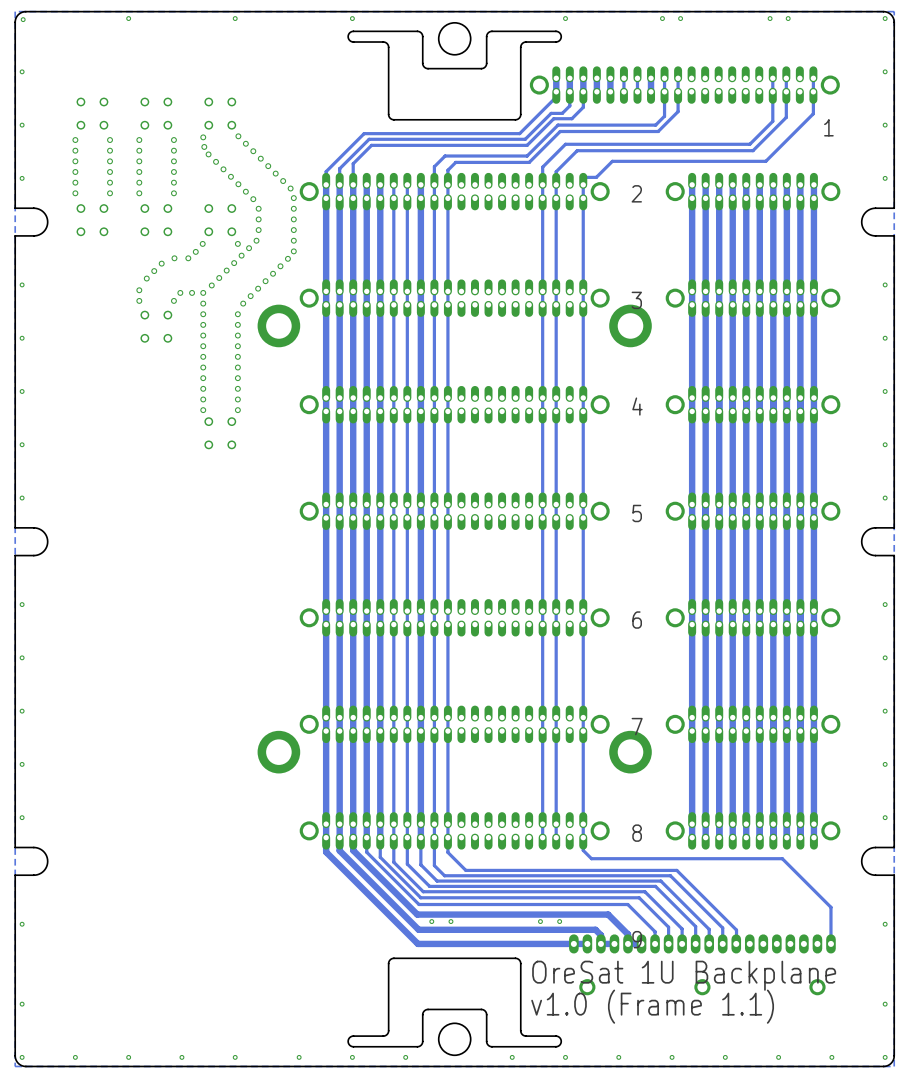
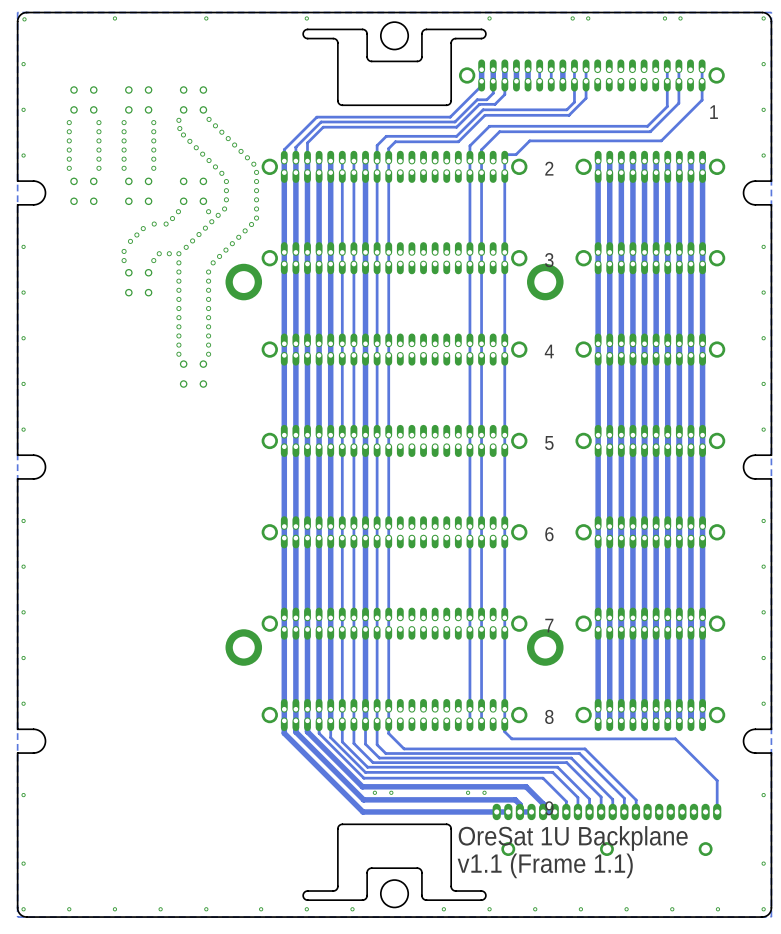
text: v1.0 (Frame 1.1) (652, 1006) -> v1.1 (Frame 1.1) (545, 865)

